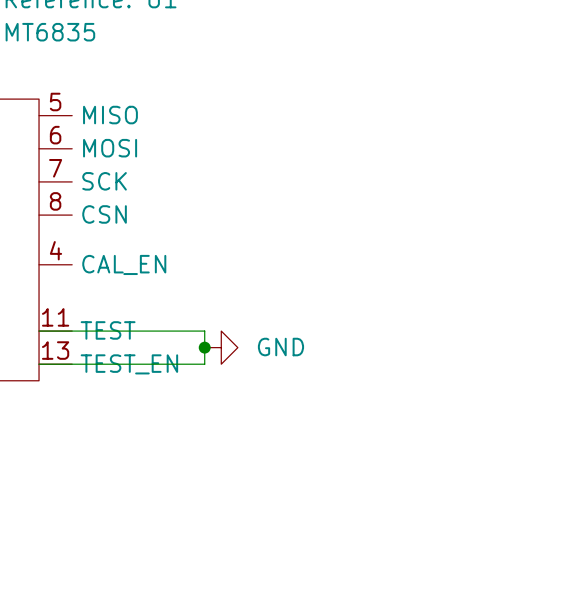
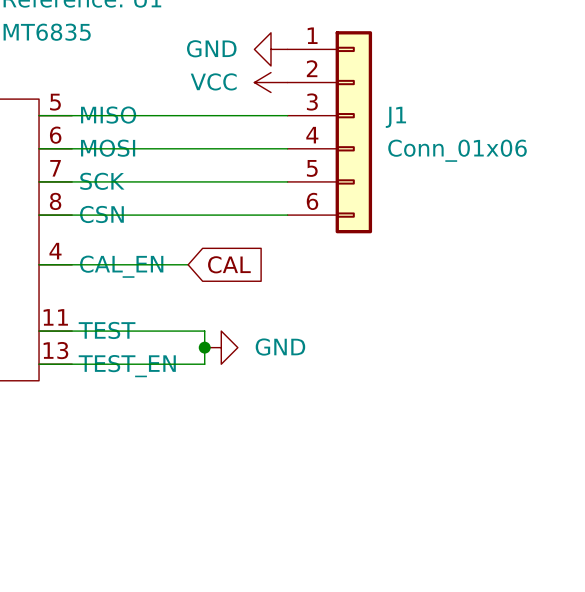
power symbol: none -> GND (270, 49)
power symbol: none -> VCC (270, 82)
wire: none -> (39, 115) (287, 115)
J1: none -> Conn_01x06 (329, 132)
wire: none -> (39, 148) (287, 148)
wire: none -> (39, 181) (287, 181)
wire: none -> (39, 215) (287, 215)
wire: none -> (39, 264) (188, 264)
global label: none -> CAL (229, 264)

